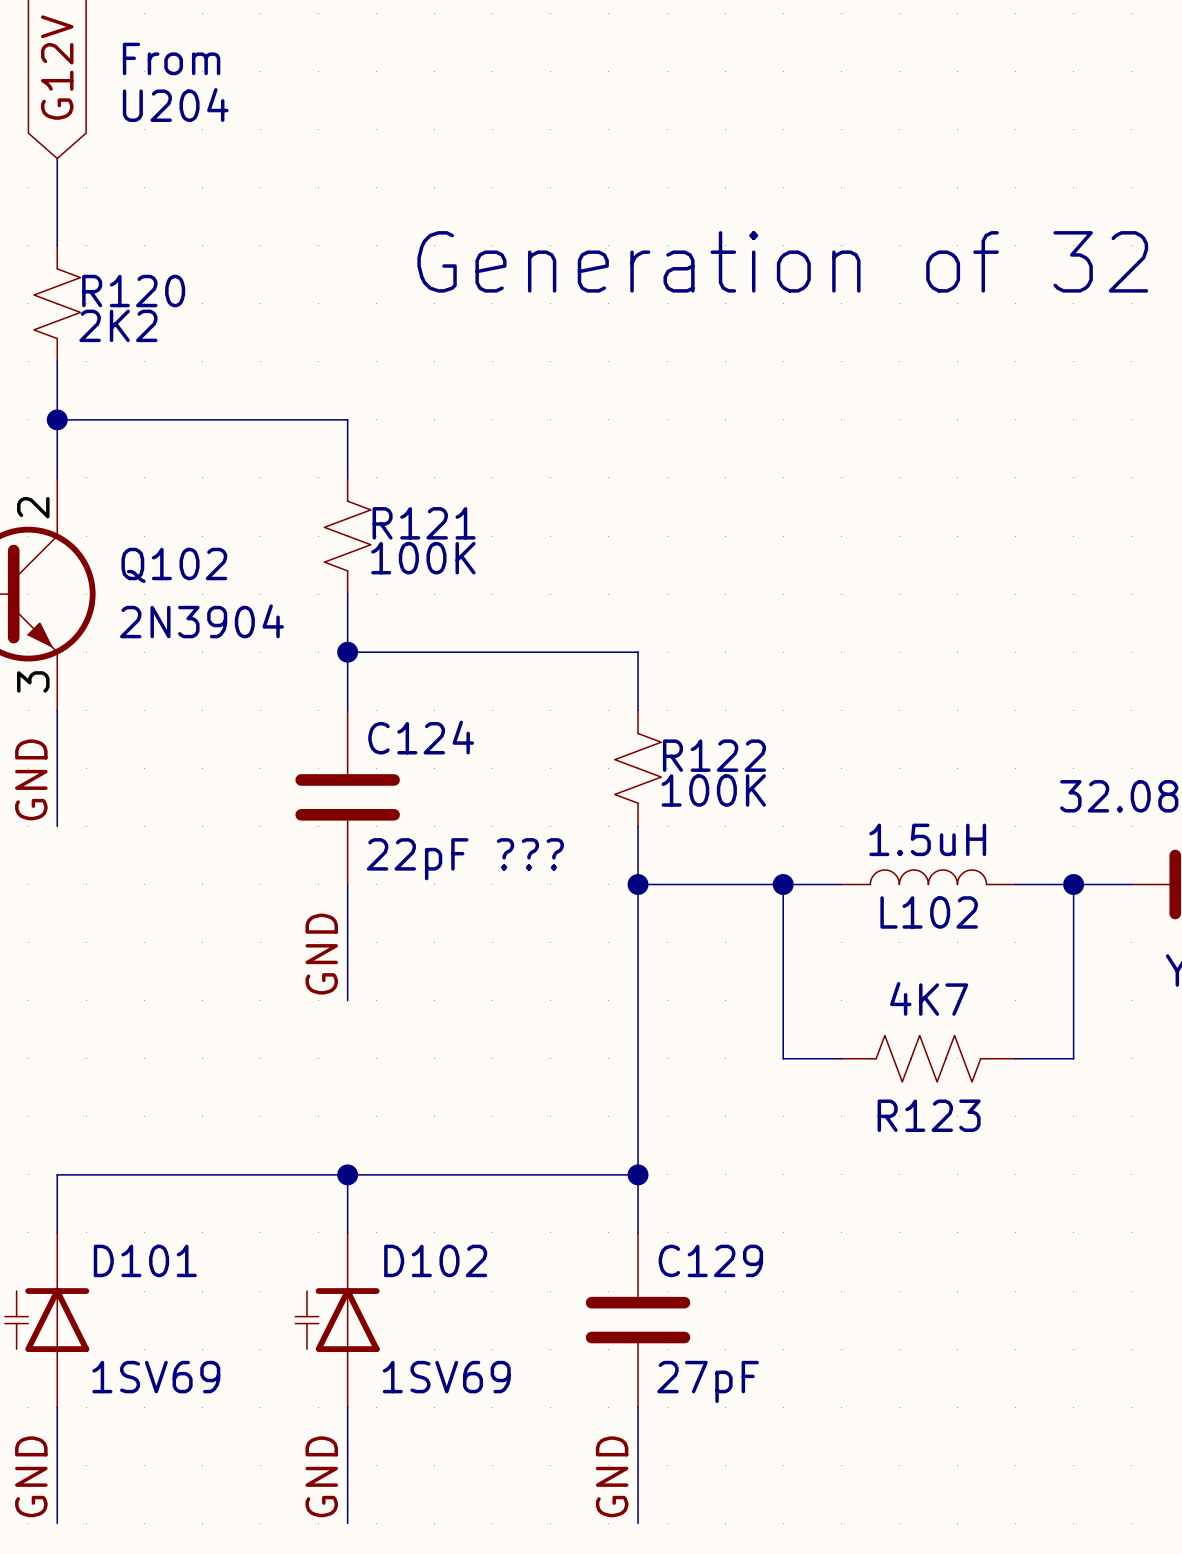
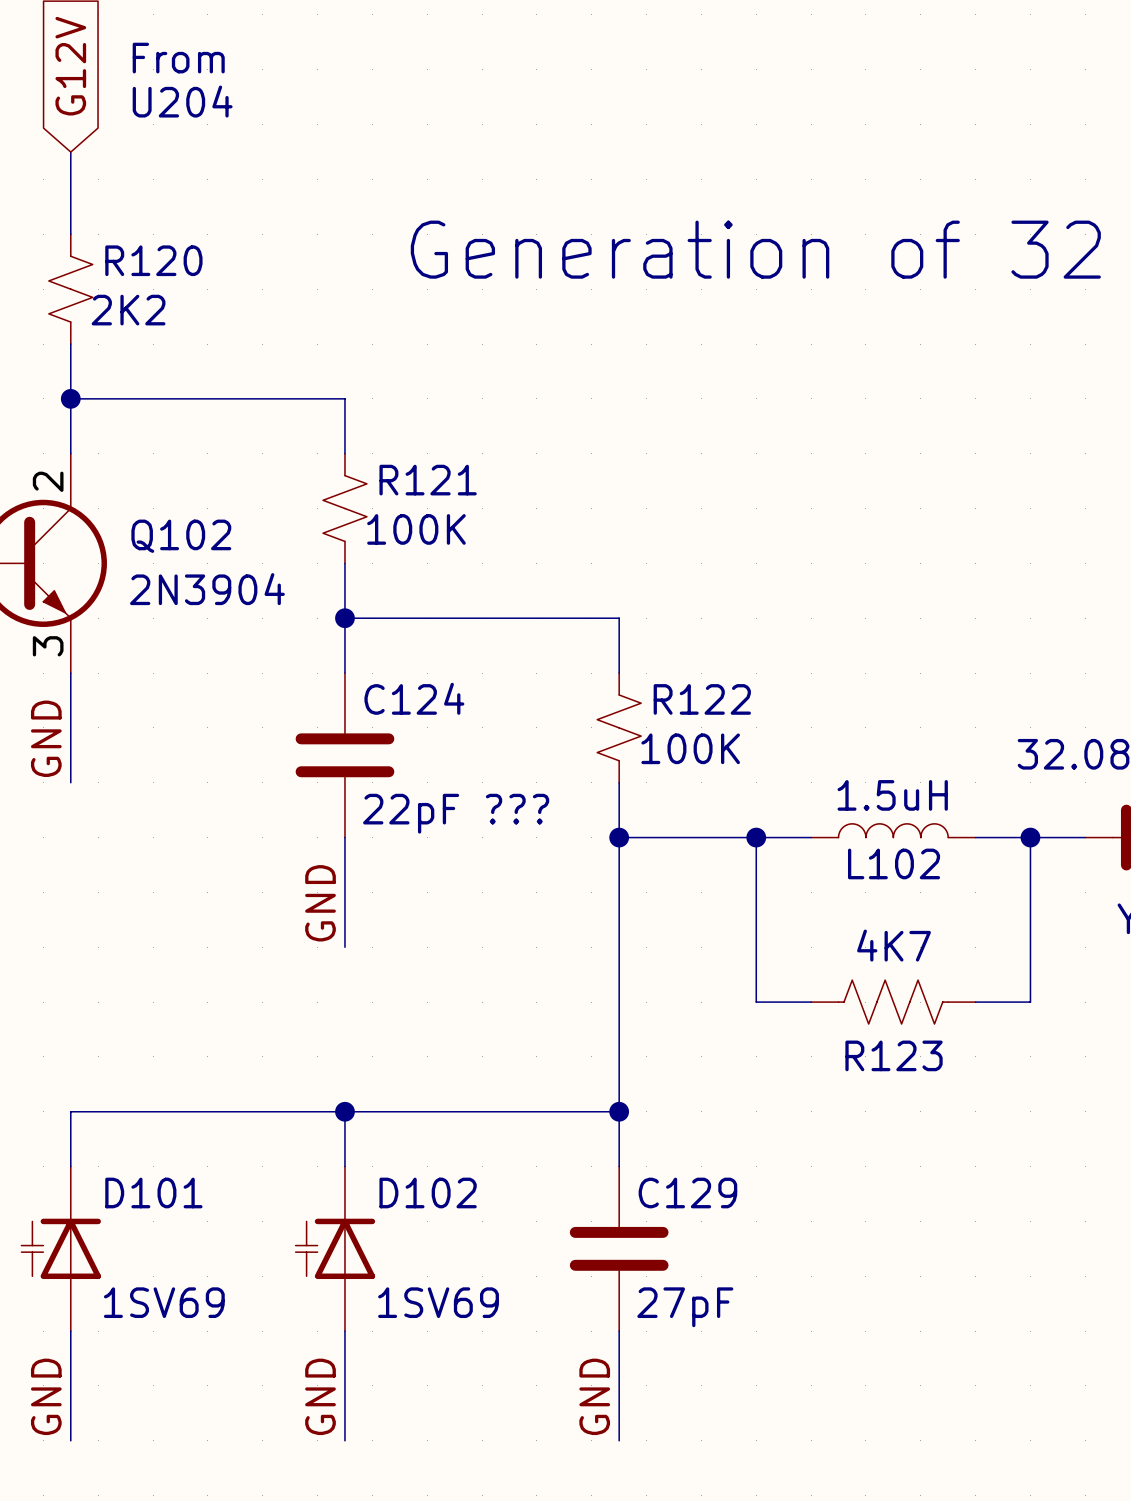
R120 name position: R120 (133, 291) -> R120 (153, 260)
R121 name position: R121 (424, 523) -> R121 (428, 480)
R122 name position: R122 (714, 755) -> R122 (702, 699)

